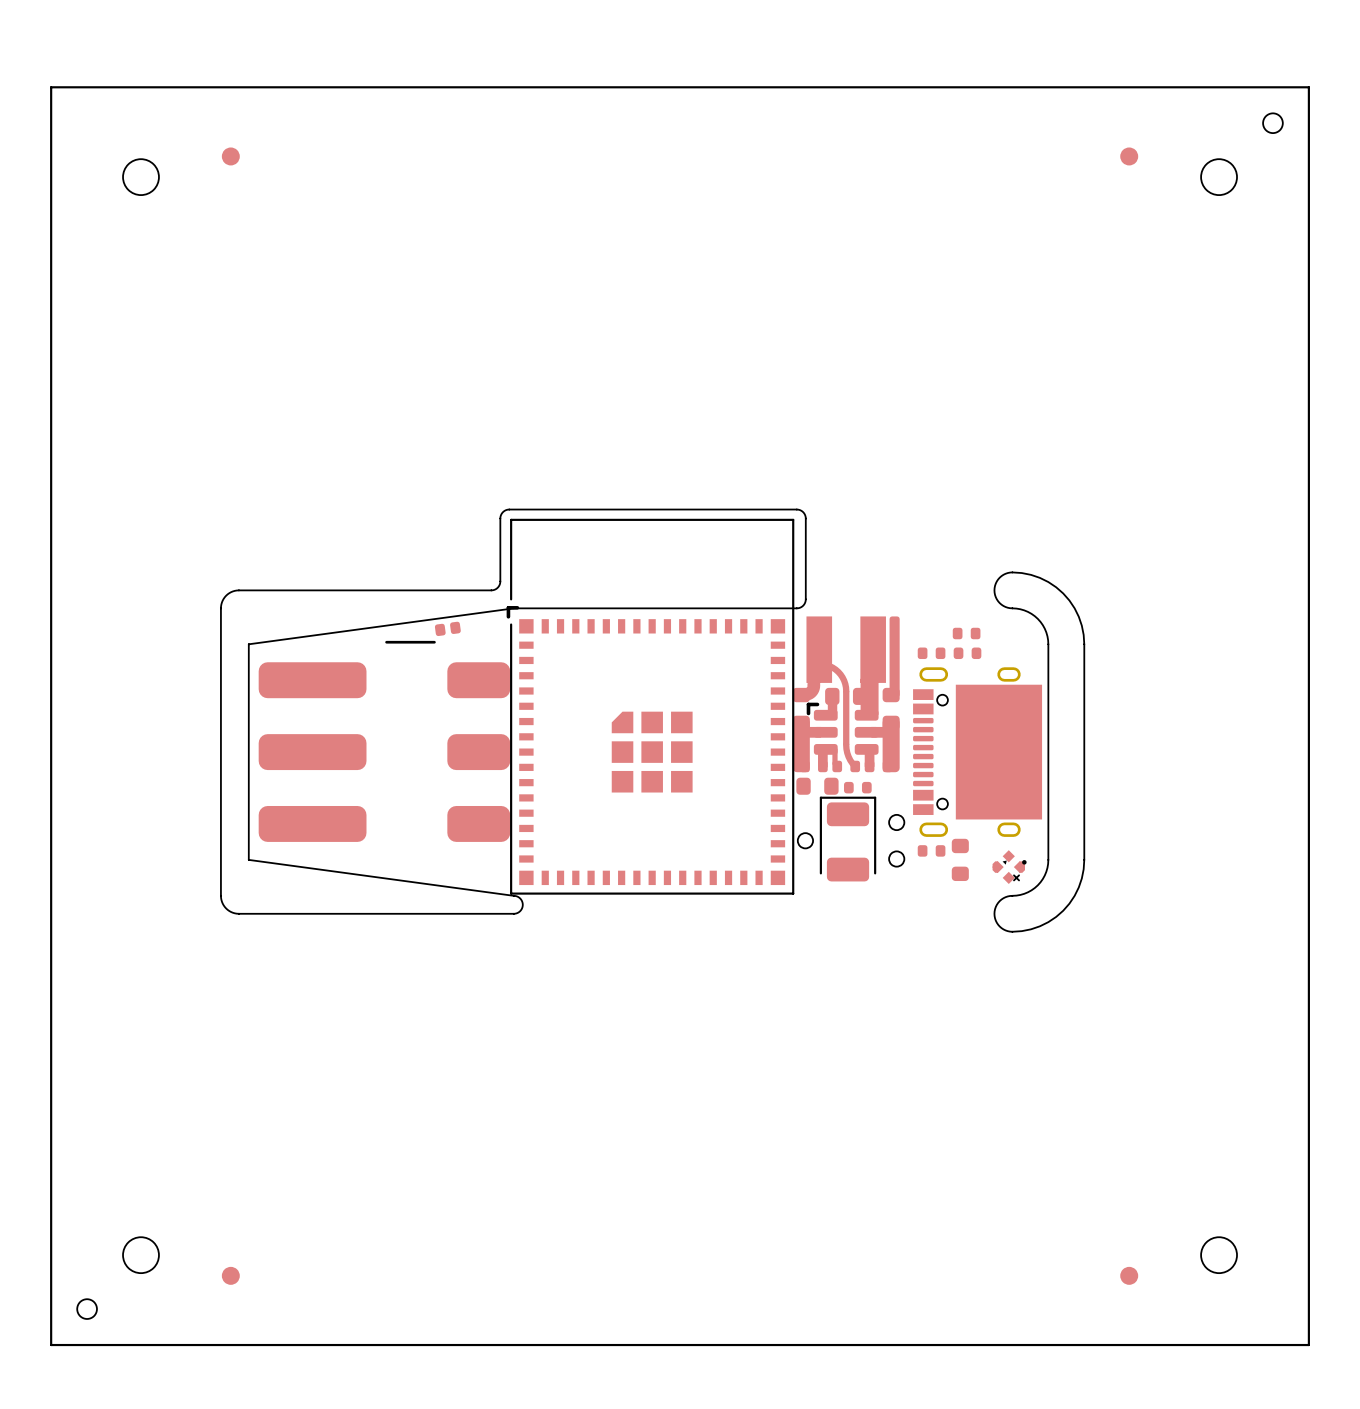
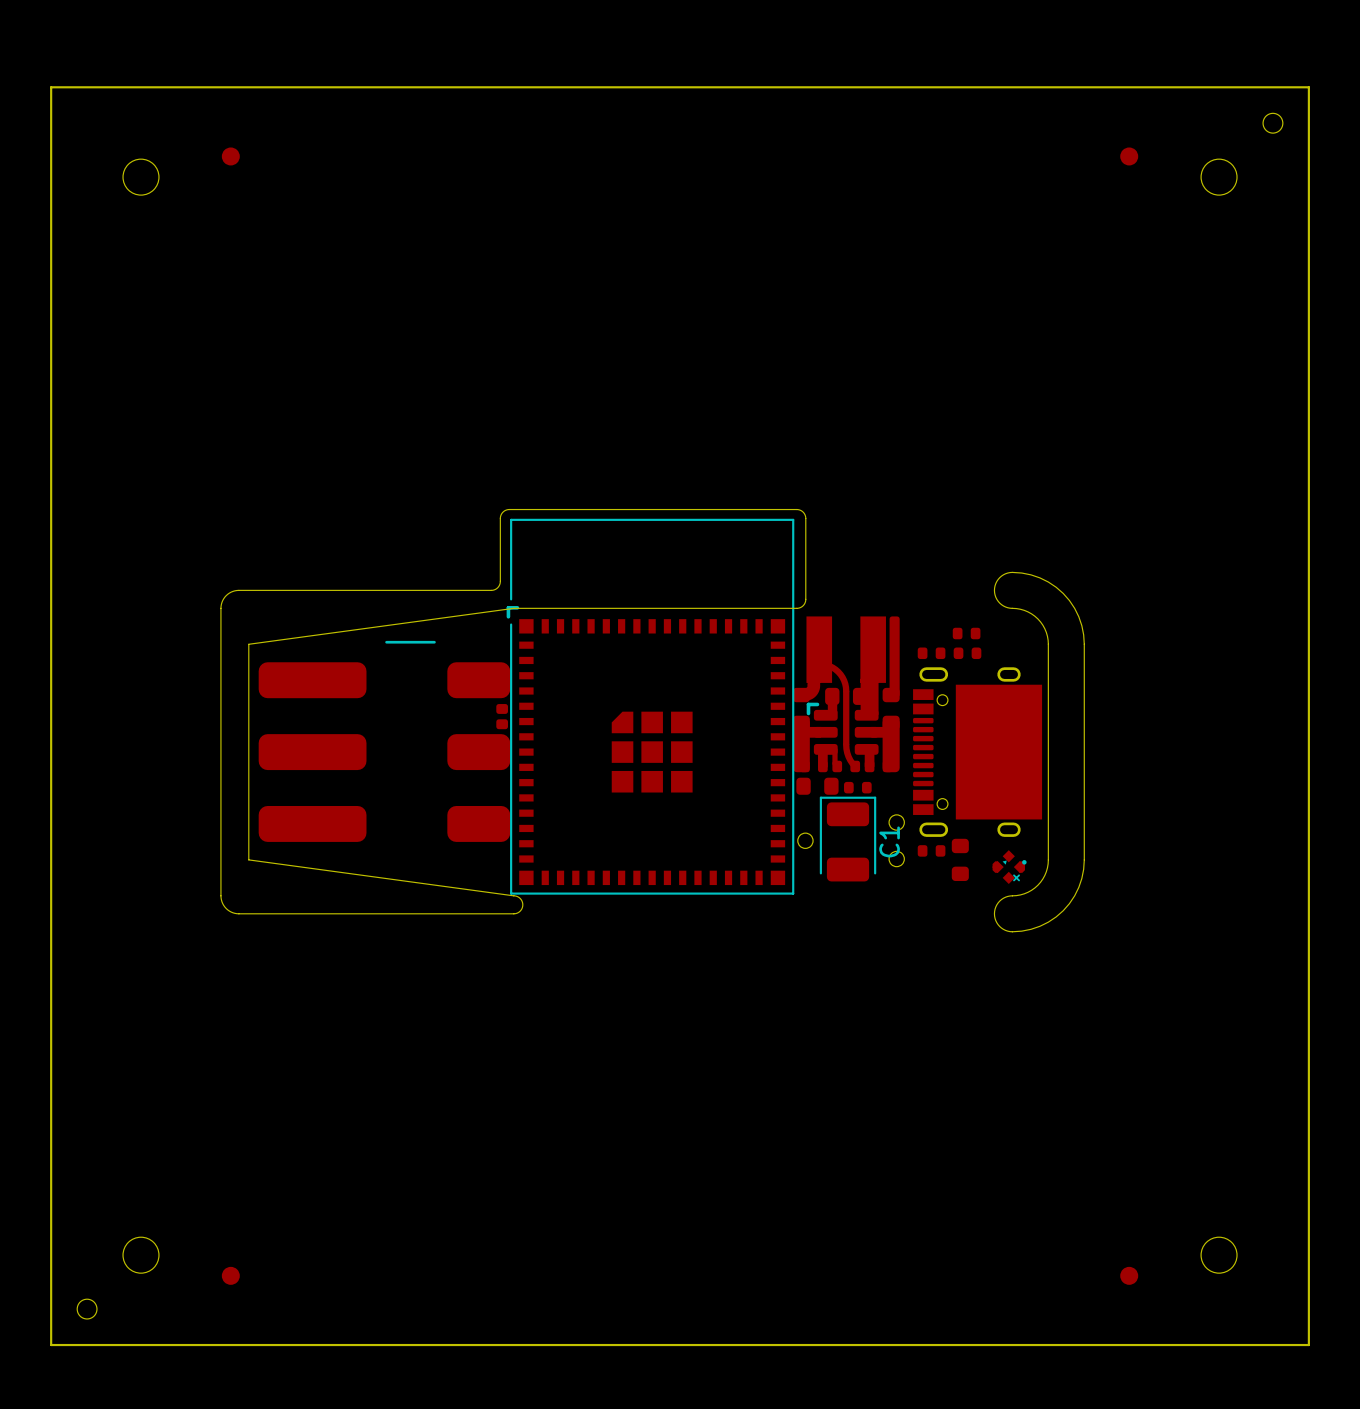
part: (447, 628) -> none
part: none -> (502, 716)
C1 name: none -> C1 (889, 841)

